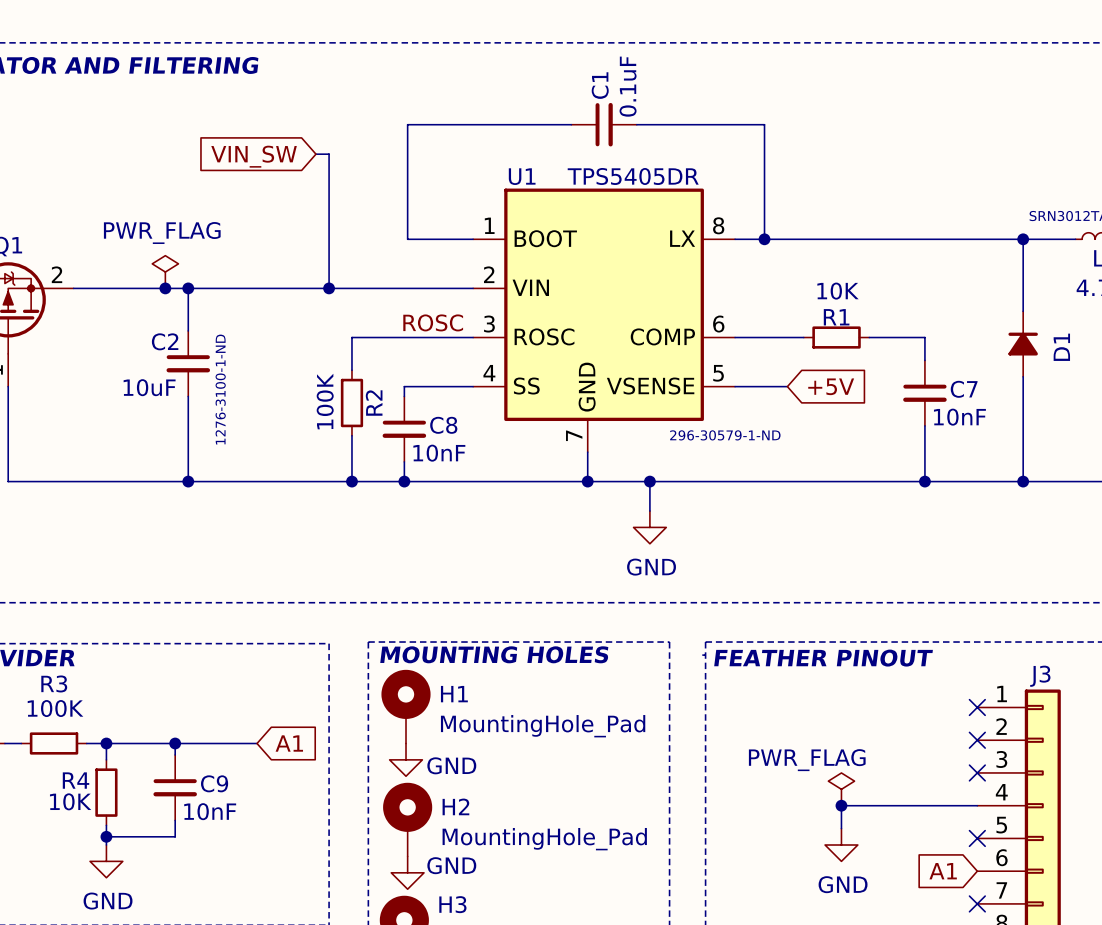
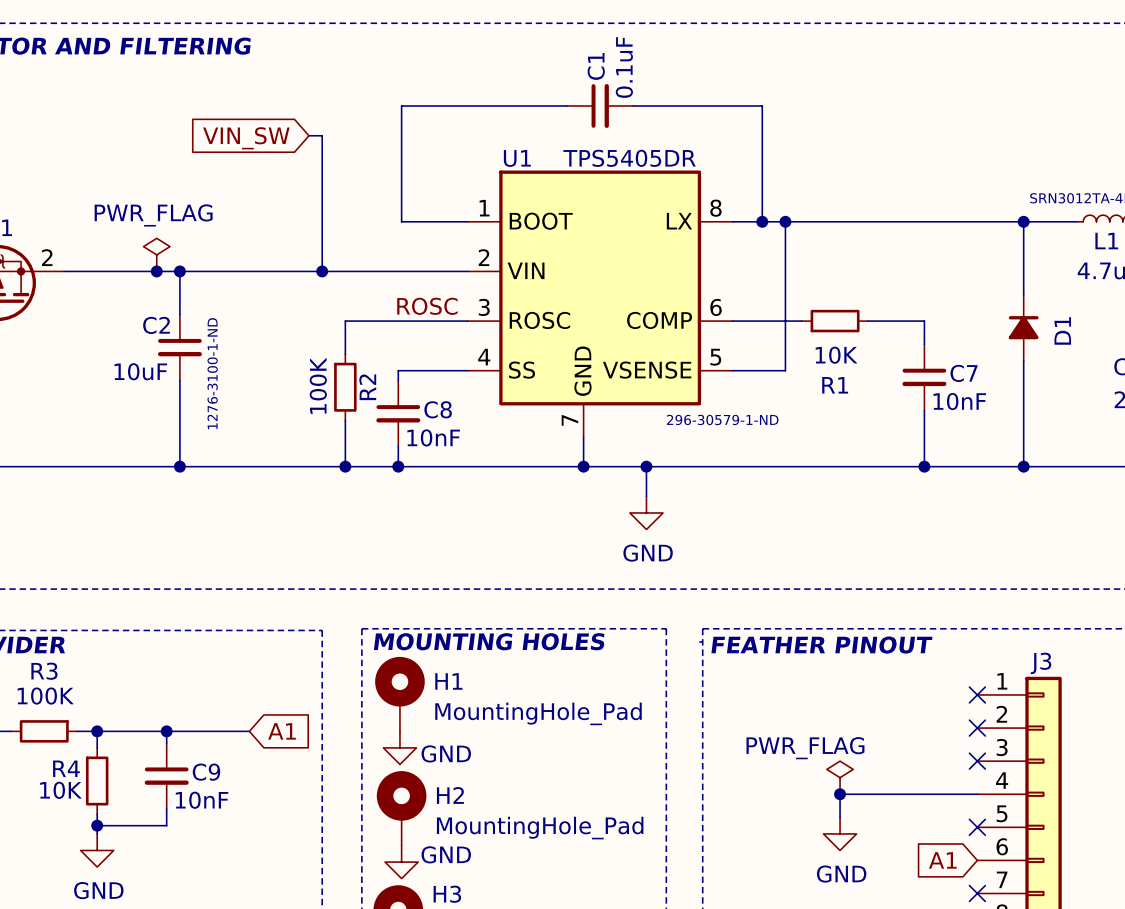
wire: none -> (785, 221) (785, 370)
junction: none -> (785, 221)
R1 value position: 10K (838, 291) -> 10K (836, 355)
R1 name position: R1 (836, 317) -> R1 (835, 385)
global label: +5V (831, 386) -> none

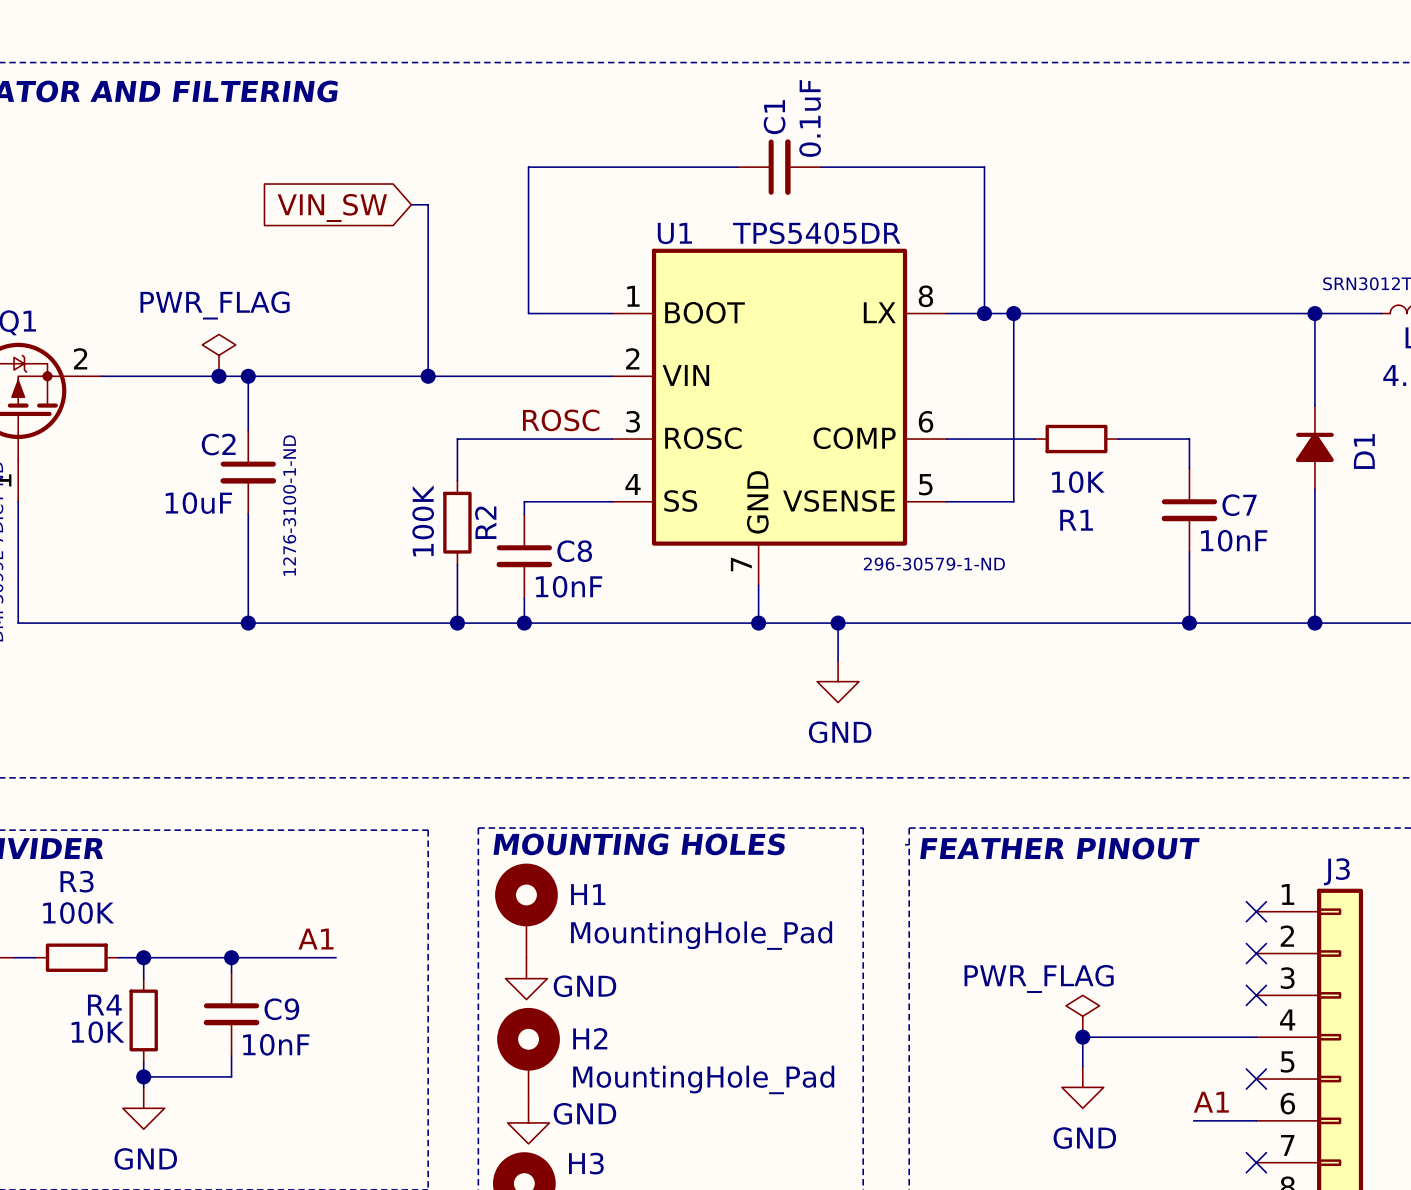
label: none -> A1 (315, 939)
global label: A1 (282, 731) -> none
label: none -> A1 (1211, 1102)
wire: none -> (1193, 1120) (1256, 1120)
global label: A1 (942, 860) -> none

